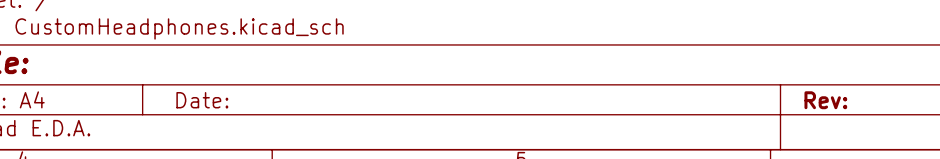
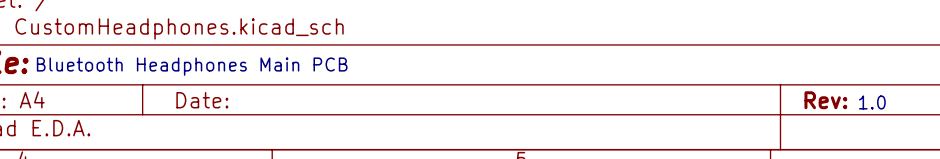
text: none -> Bluetooth Headphones Main PCB (192, 66)
text: none -> 1.0 (872, 102)

